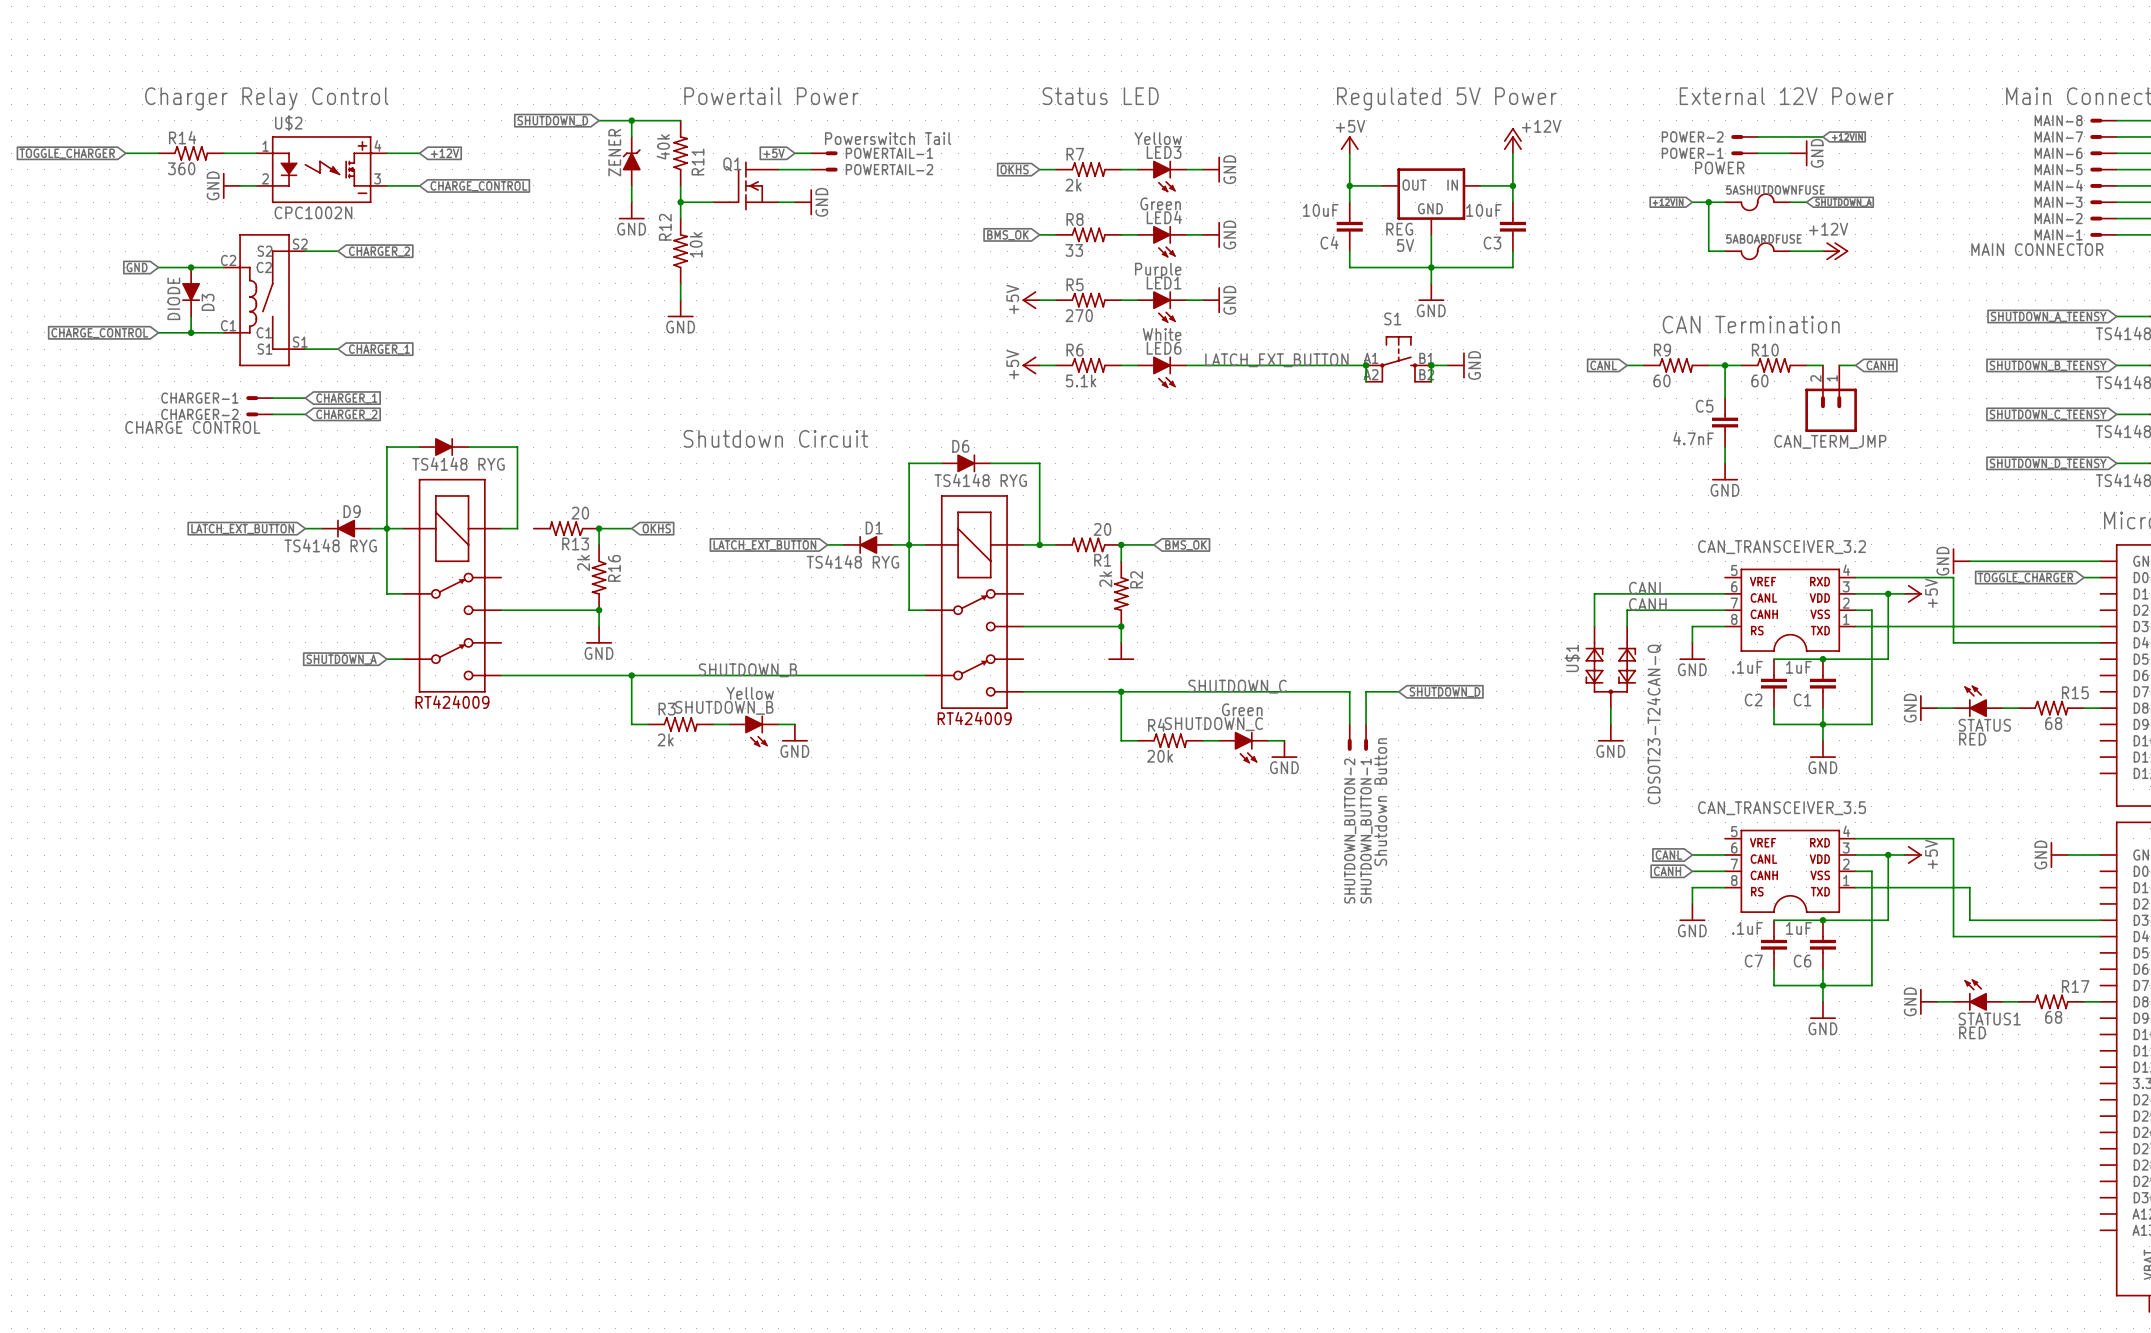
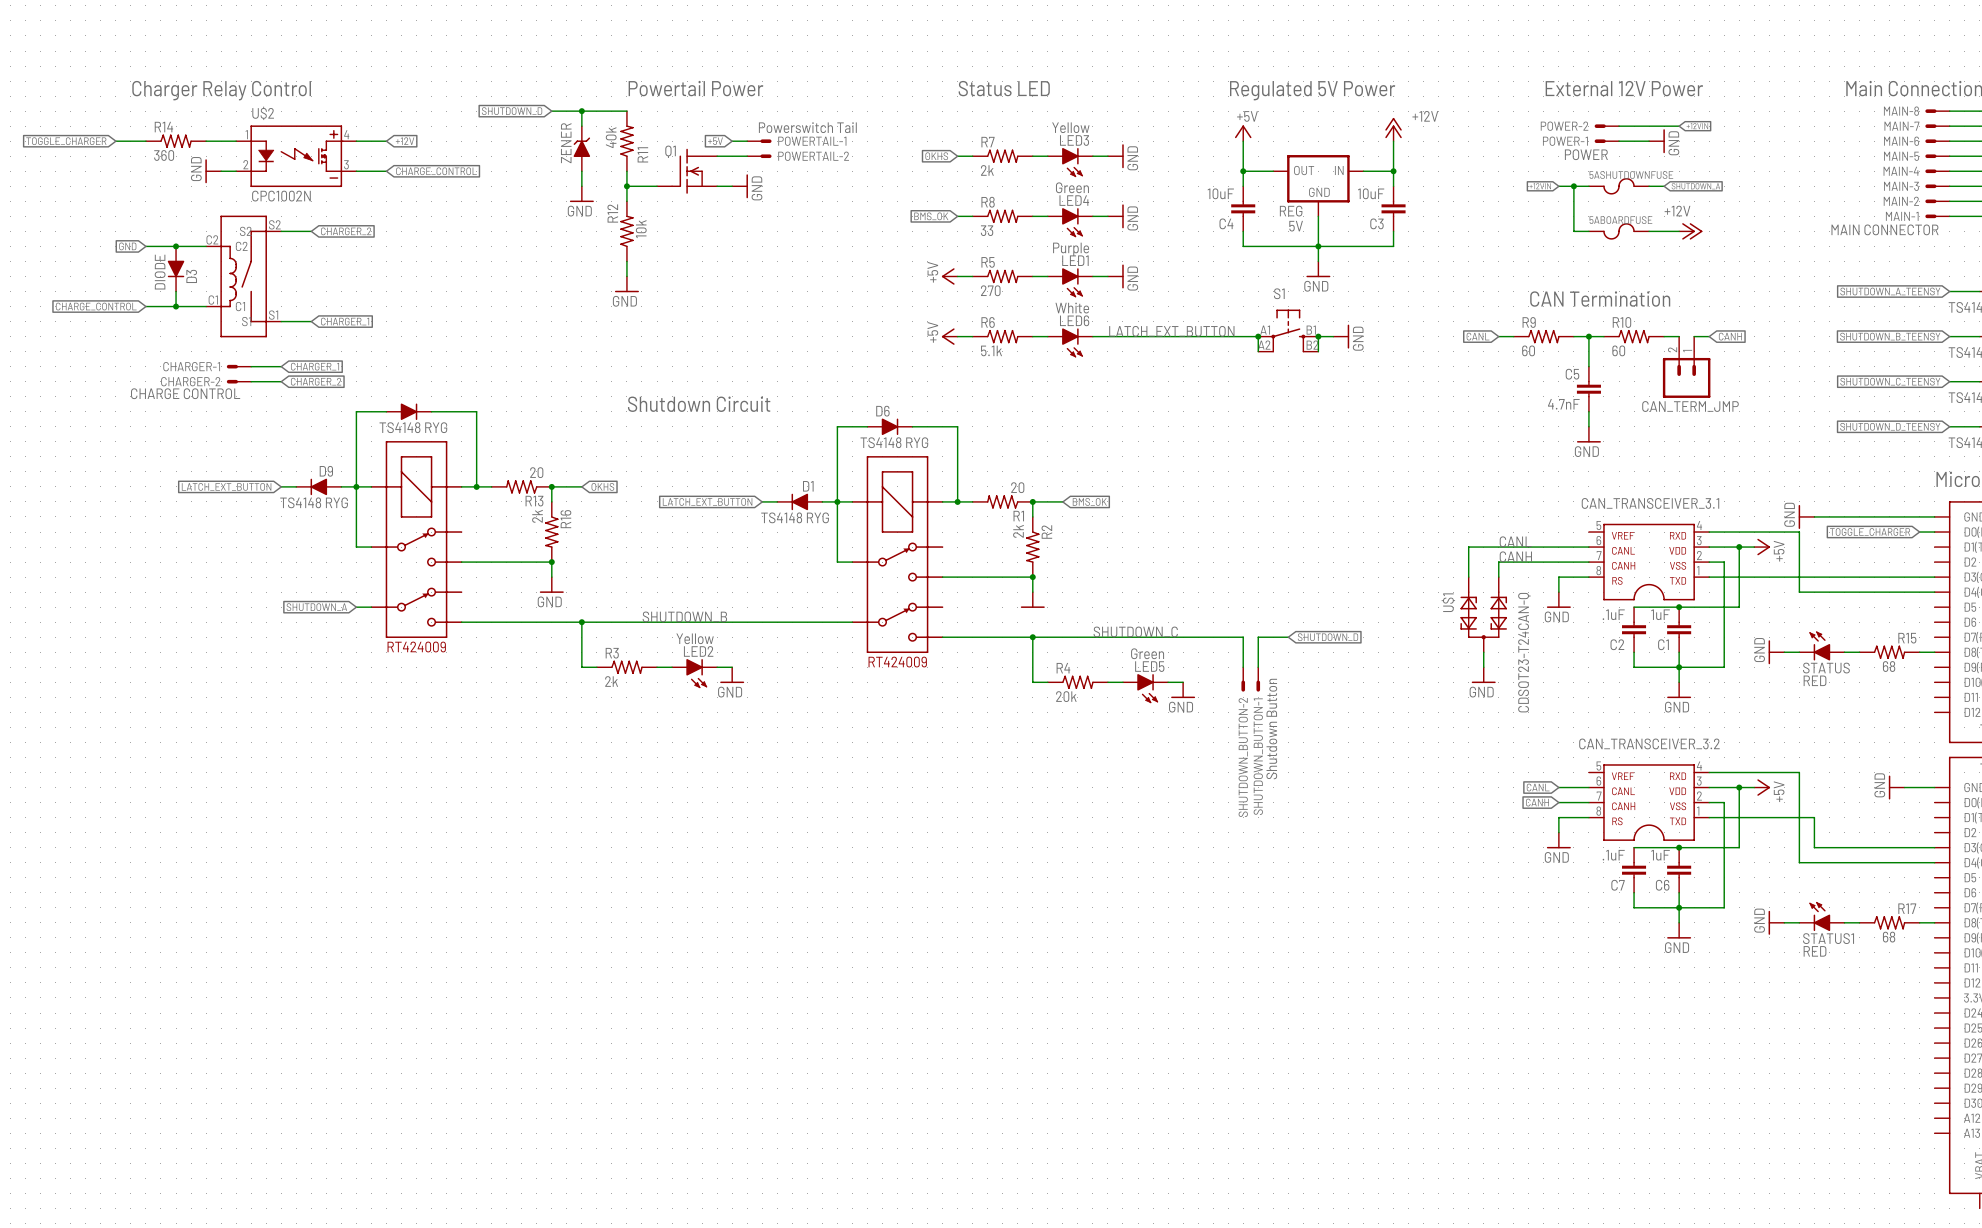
wire: none -> (476, 486) (491, 486)
junction: none -> (476, 486)
CAN_TRANSCEIVER_3.2 name: CAN_TRANSCEIVER_3.2 (1782, 547) -> CAN_TRANSCEIVER_3.1 (1650, 503)
SHUTDOWN_B name: SHUTDOWN_B (724, 707) -> LED2 (698, 651)
SHUTDOWN_C name: SHUTDOWN_C (1213, 724) -> LED5 (1149, 666)
CAN_TRANSCEIVER_3.5 name: CAN_TRANSCEIVER_3.5 (1782, 808) -> CAN_TRANSCEIVER_3.2 (1649, 743)

